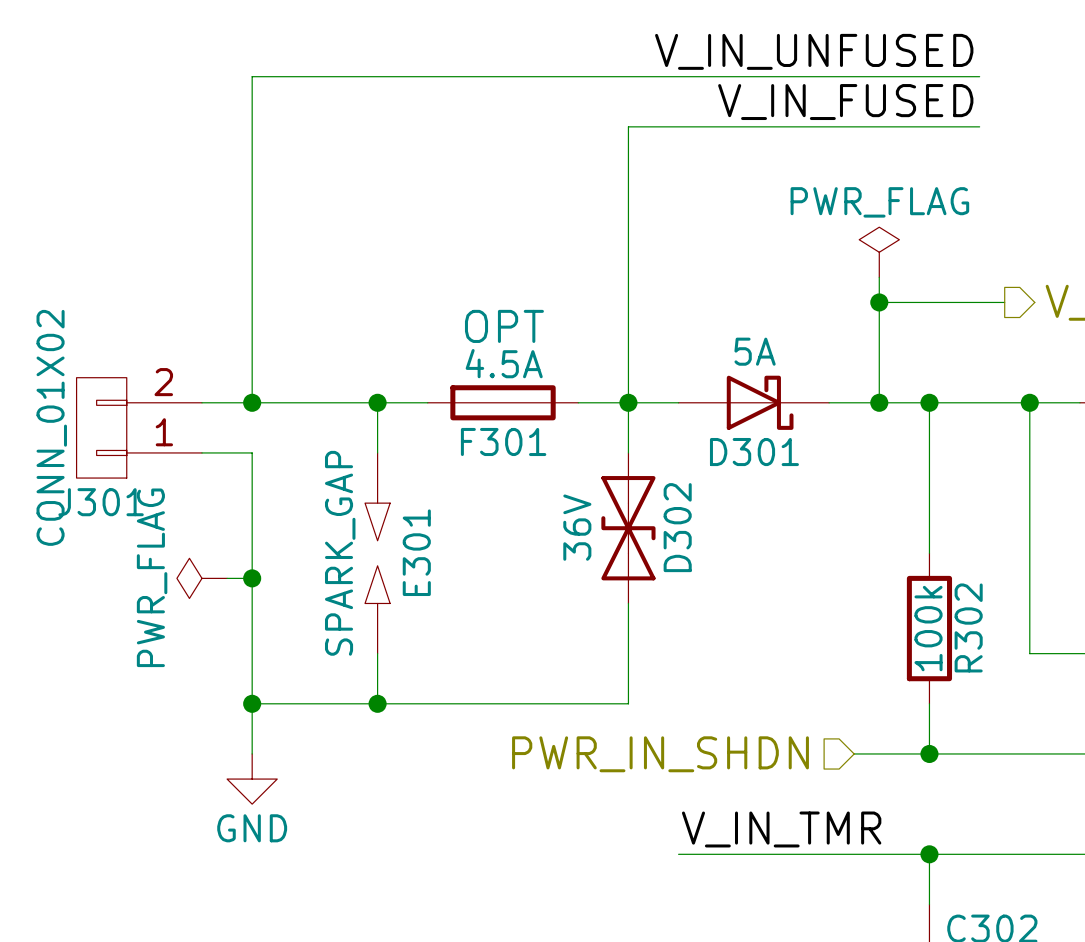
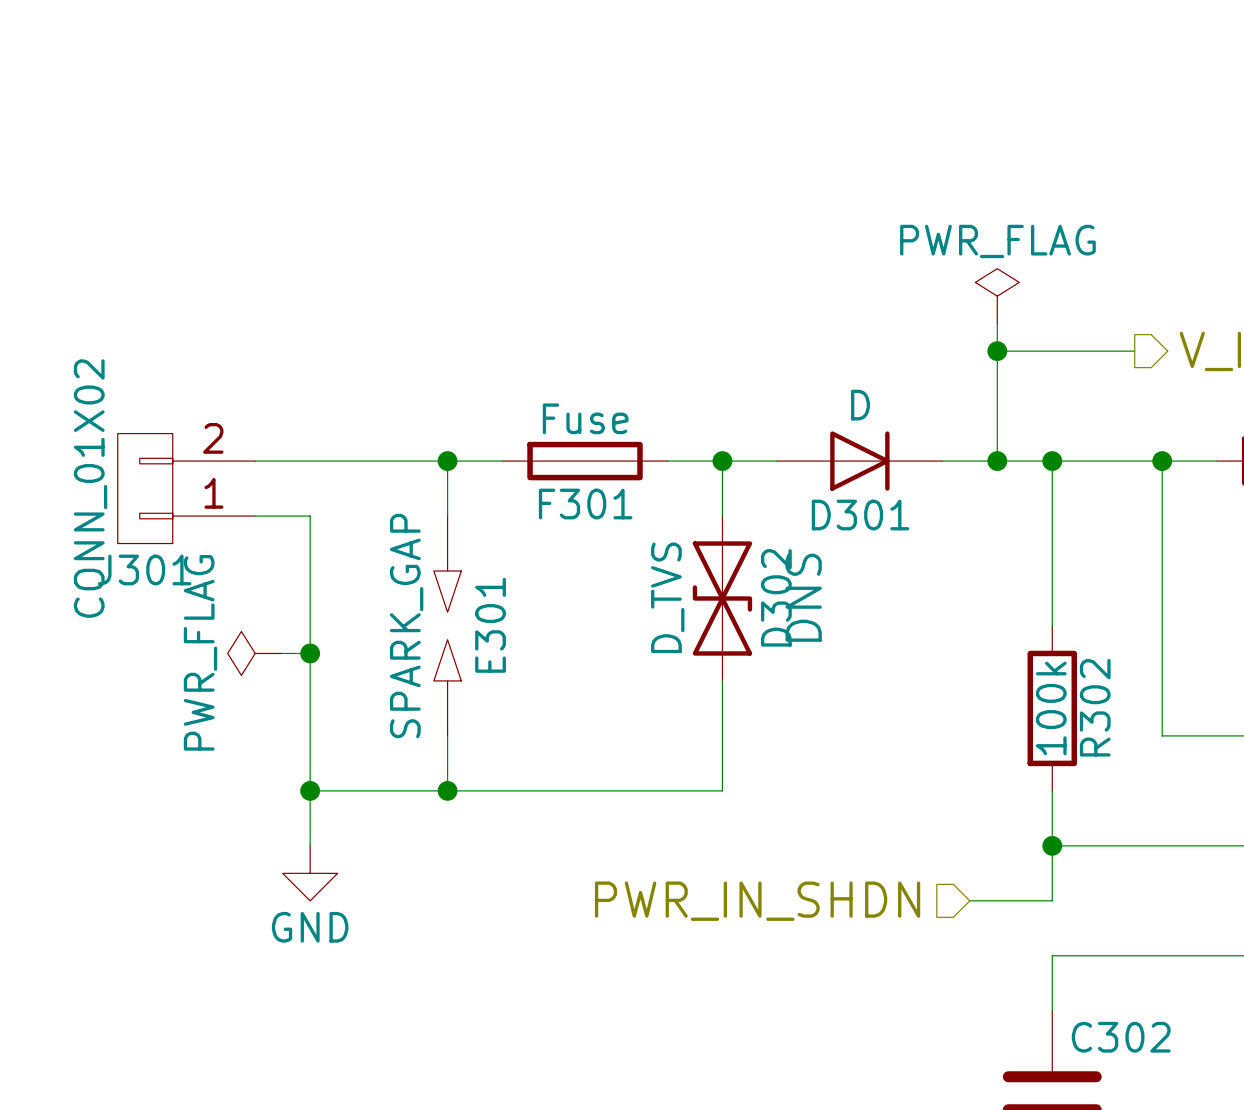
label: V_IN_UNFUSED (814, 51) -> none
wire: (979, 76) (252, 76) (252, 402) -> none
label: V_IN_FUSED (845, 102) -> none
wire: (979, 126) (628, 126) (628, 402) -> none
F301 text: OPT (504, 326) -> none
D301 value: 5A (755, 351) -> D (860, 405)
F301 value: 4.5A (504, 363) -> Fuse (585, 418)
D301 symbol: [678, 375, 830, 430] -> [777, 431, 943, 491]
junction: (252, 402) -> none
D302 value: 36V (577, 527) -> D_TVS (667, 597)
D302 text: none -> DNS (803, 597)
wire: (854, 753) (929, 753) -> (969, 900) (1052, 900) (1052, 845)
hierarchical label position: PWR_IN_SHDN (660, 754) -> PWR_IN_SHDN (757, 901)
label: V_IN_TMR (781, 829) -> none
wire: (678, 854) (929, 854) -> none
junction: (929, 854) -> none

